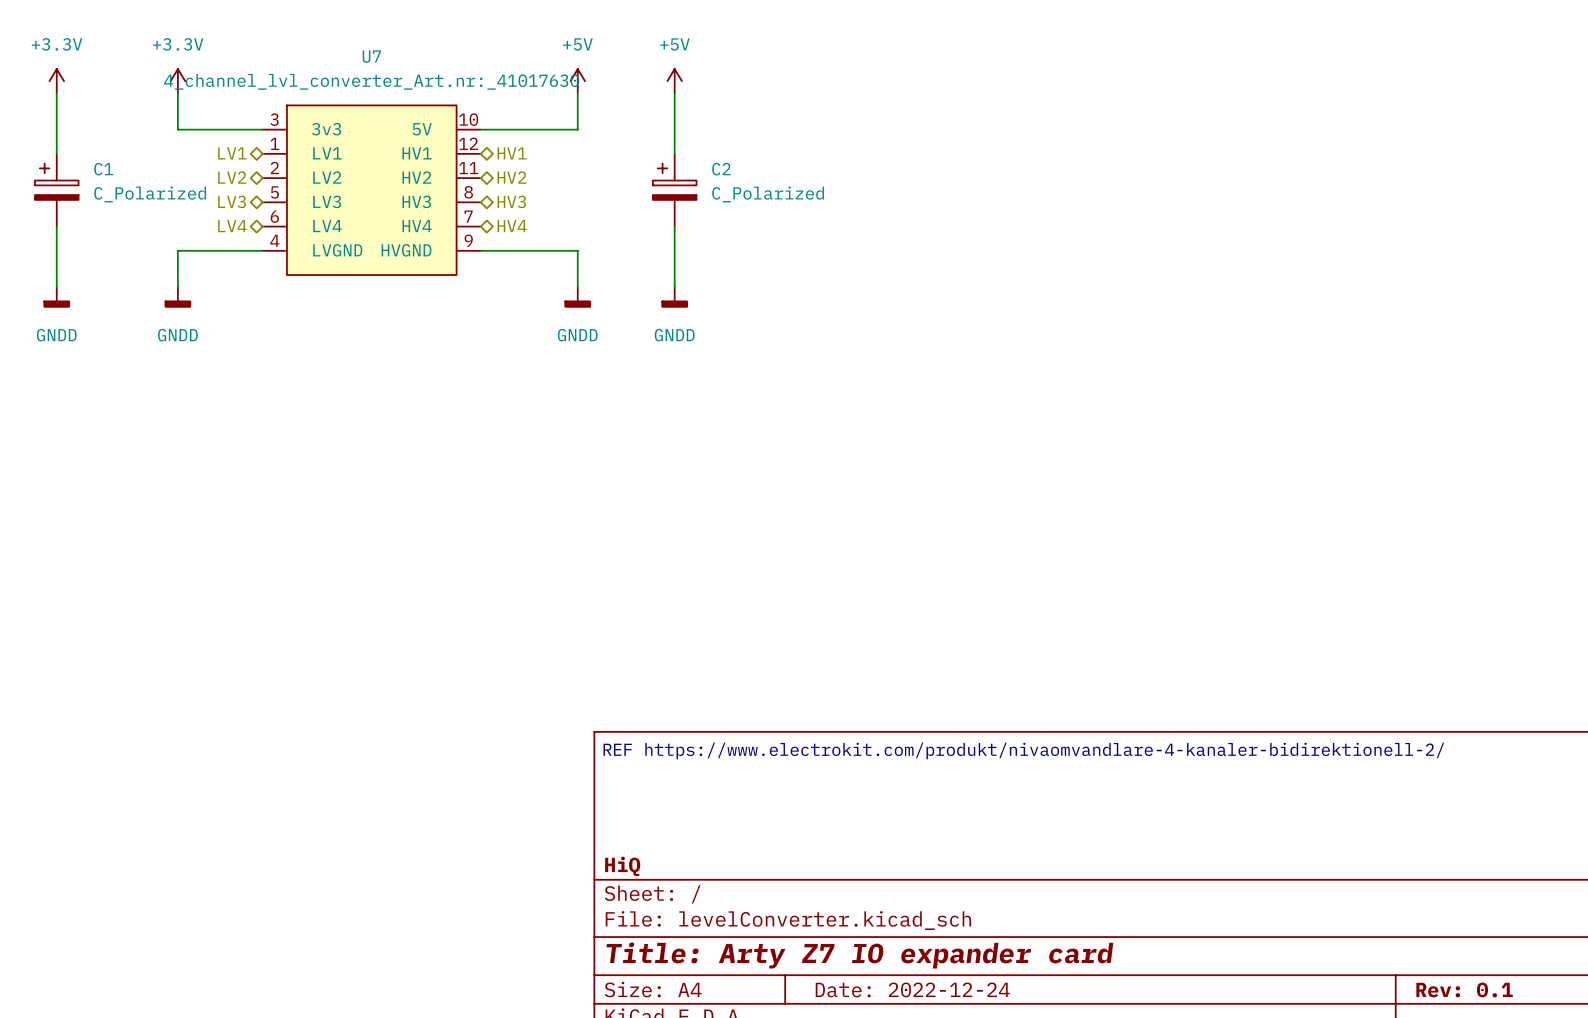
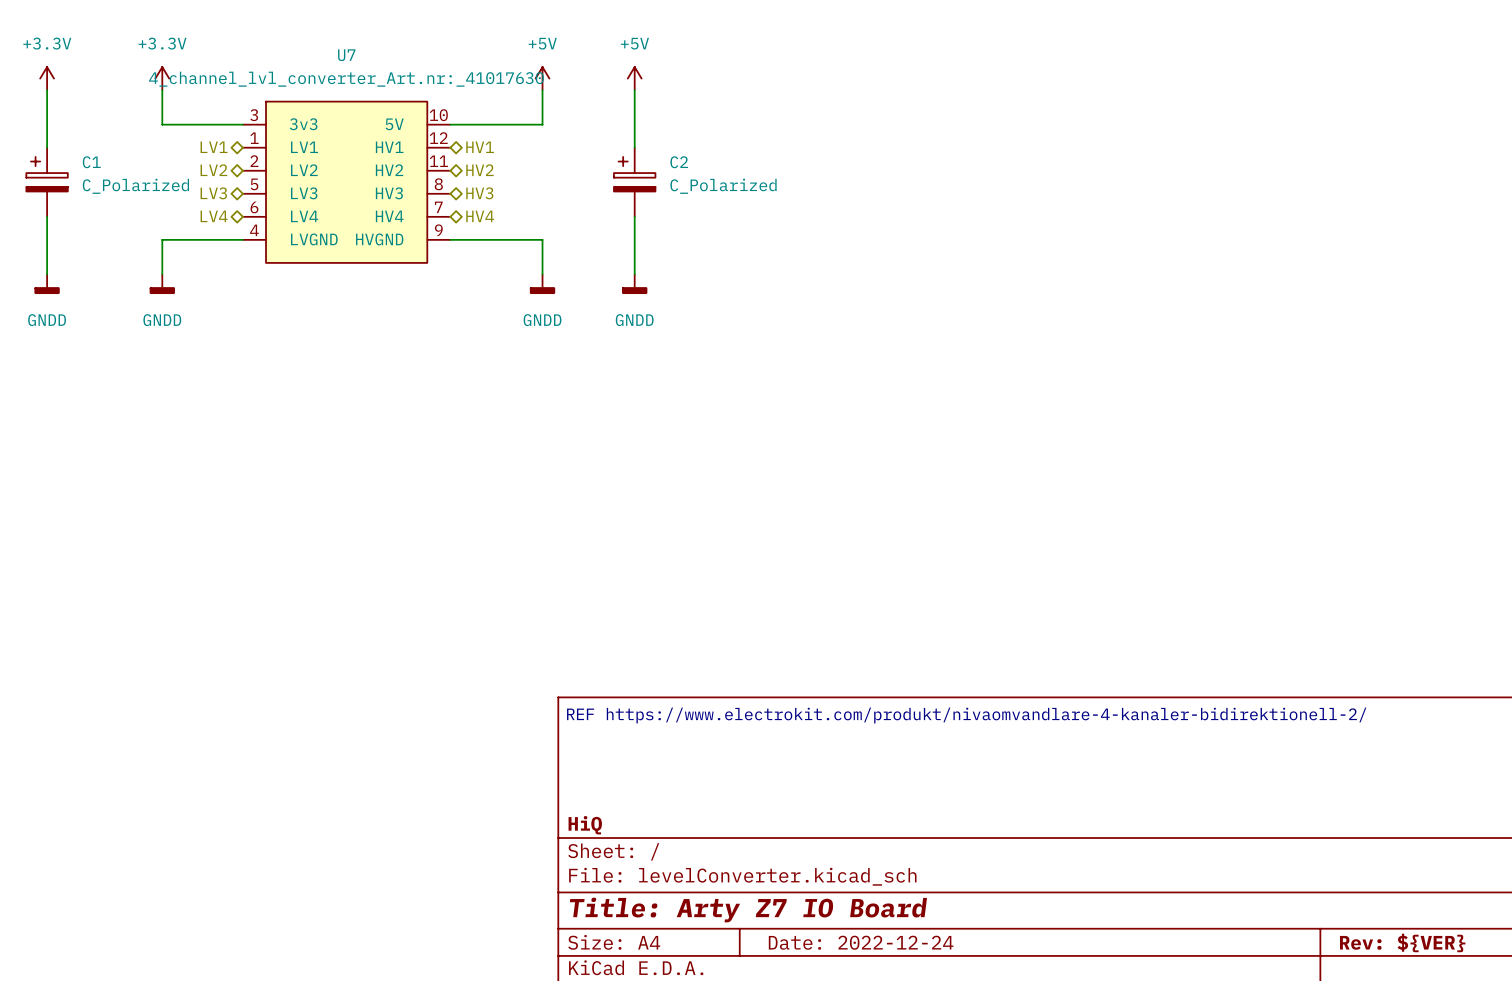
title block: Title: Arty Z7 IO expander card (859, 955) -> Title: Arty Z7 IO Board (748, 910)
title block: Rev: 0.1 (1464, 989) -> Rev: ${VER} (1402, 942)

